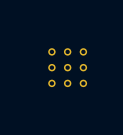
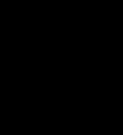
part: (67, 67) -> none

